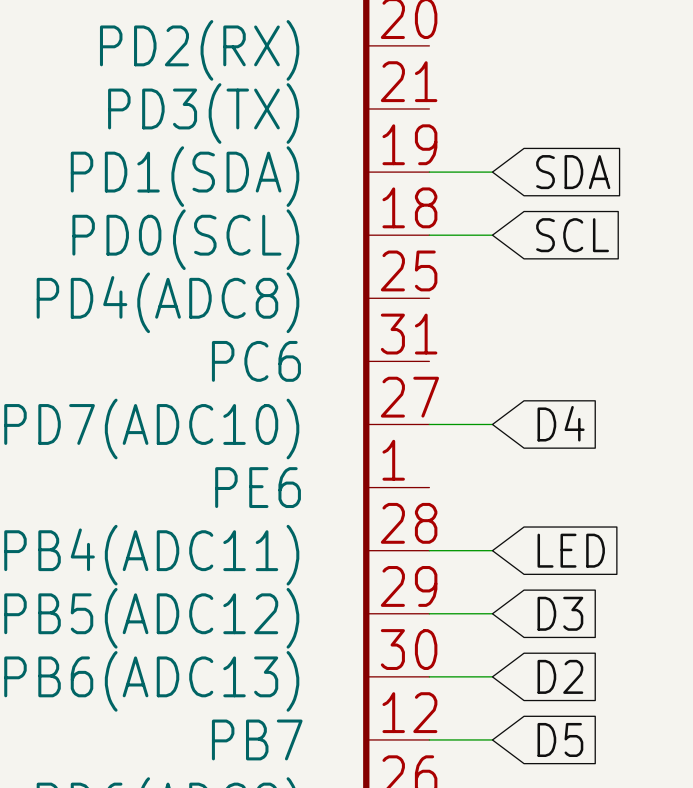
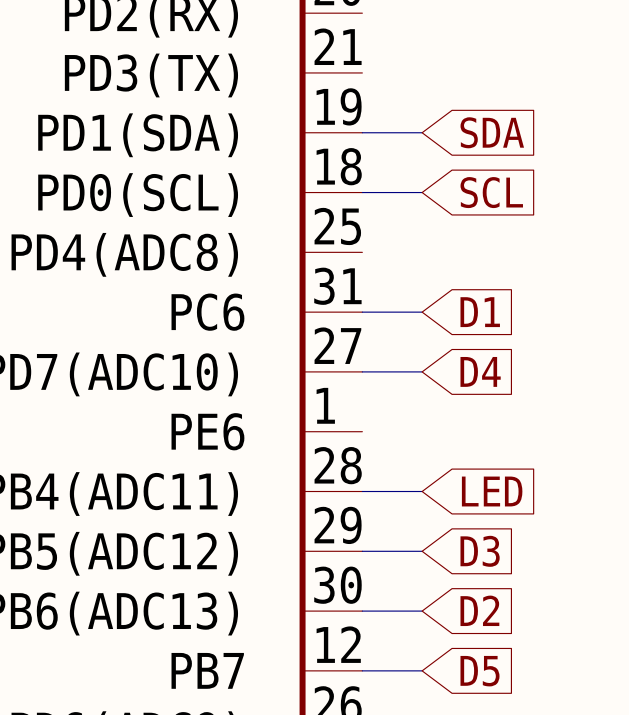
wire: none -> (362, 312) (422, 312)
global label: none -> D1 (480, 312)

